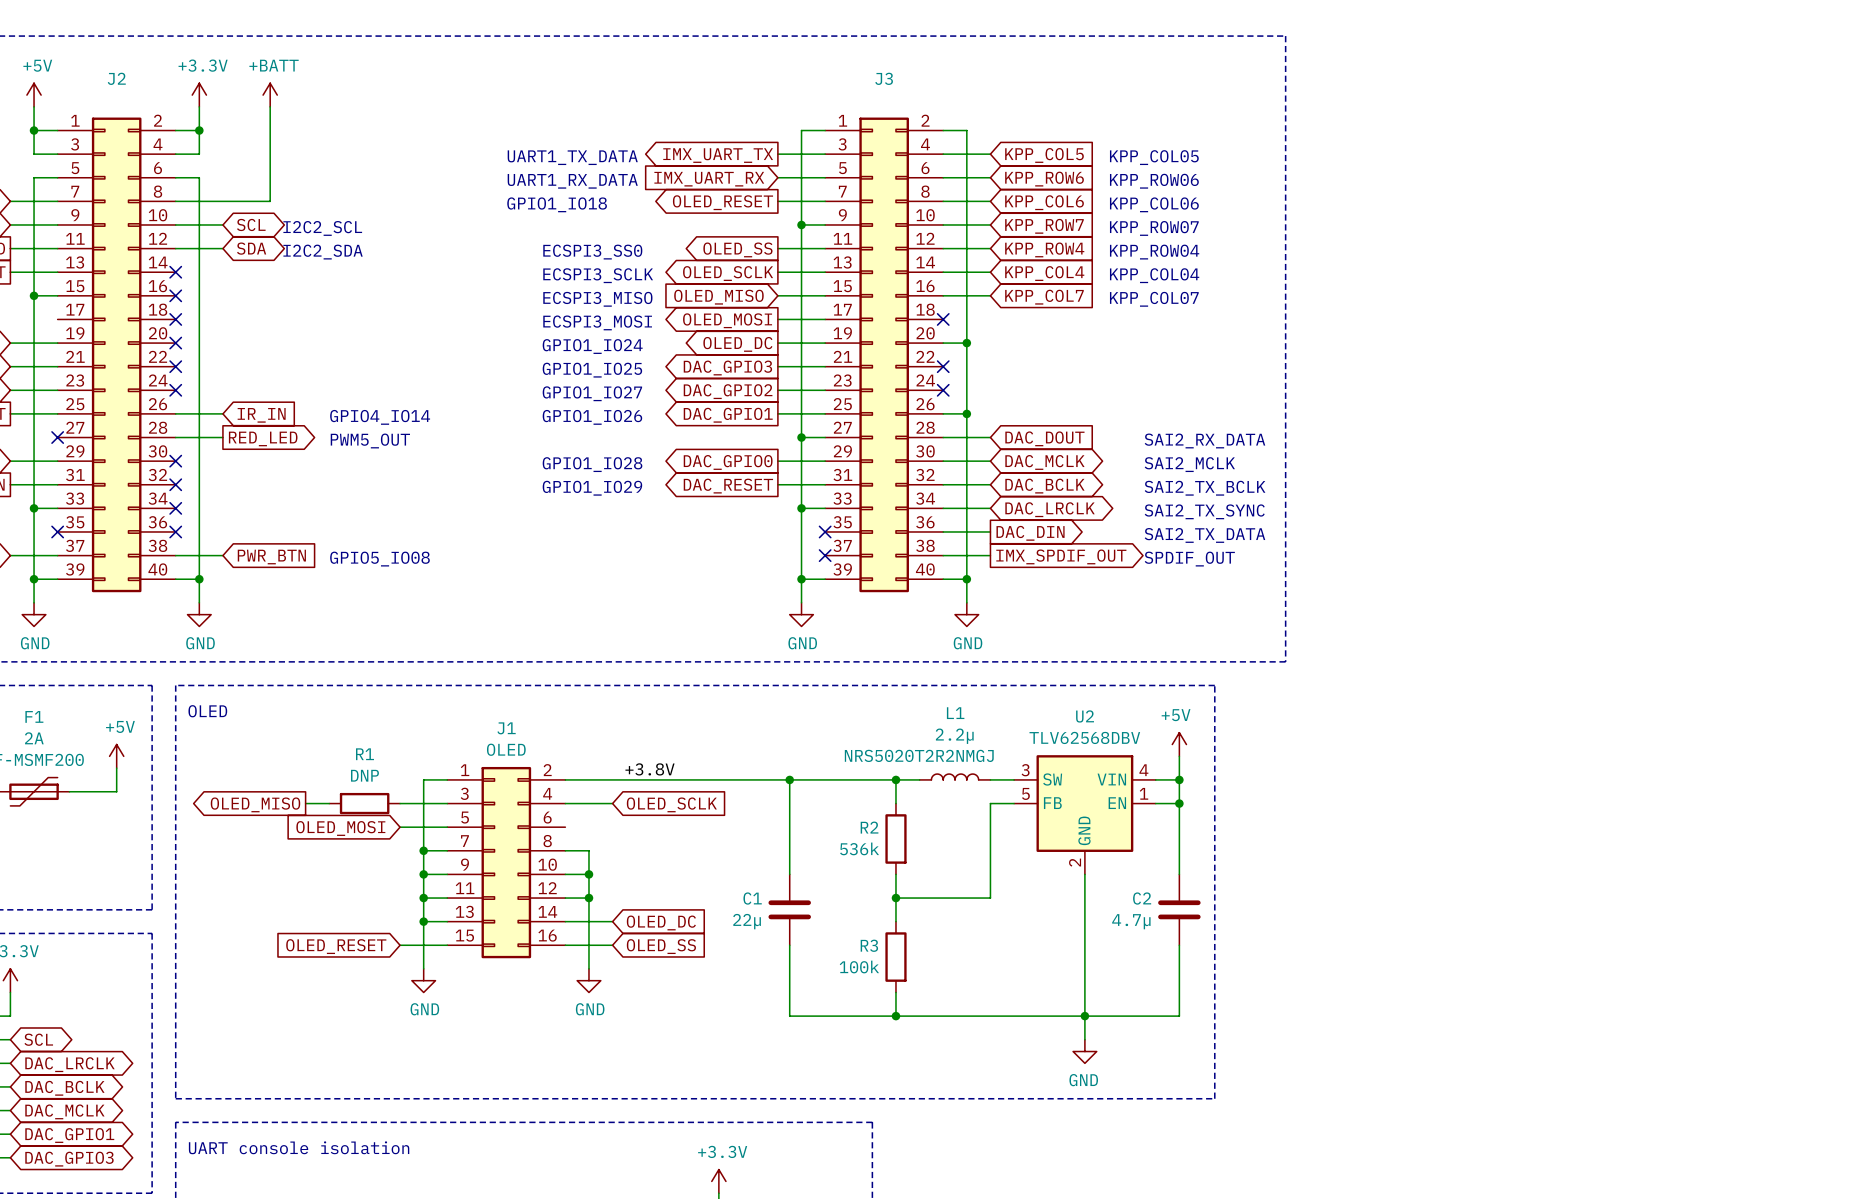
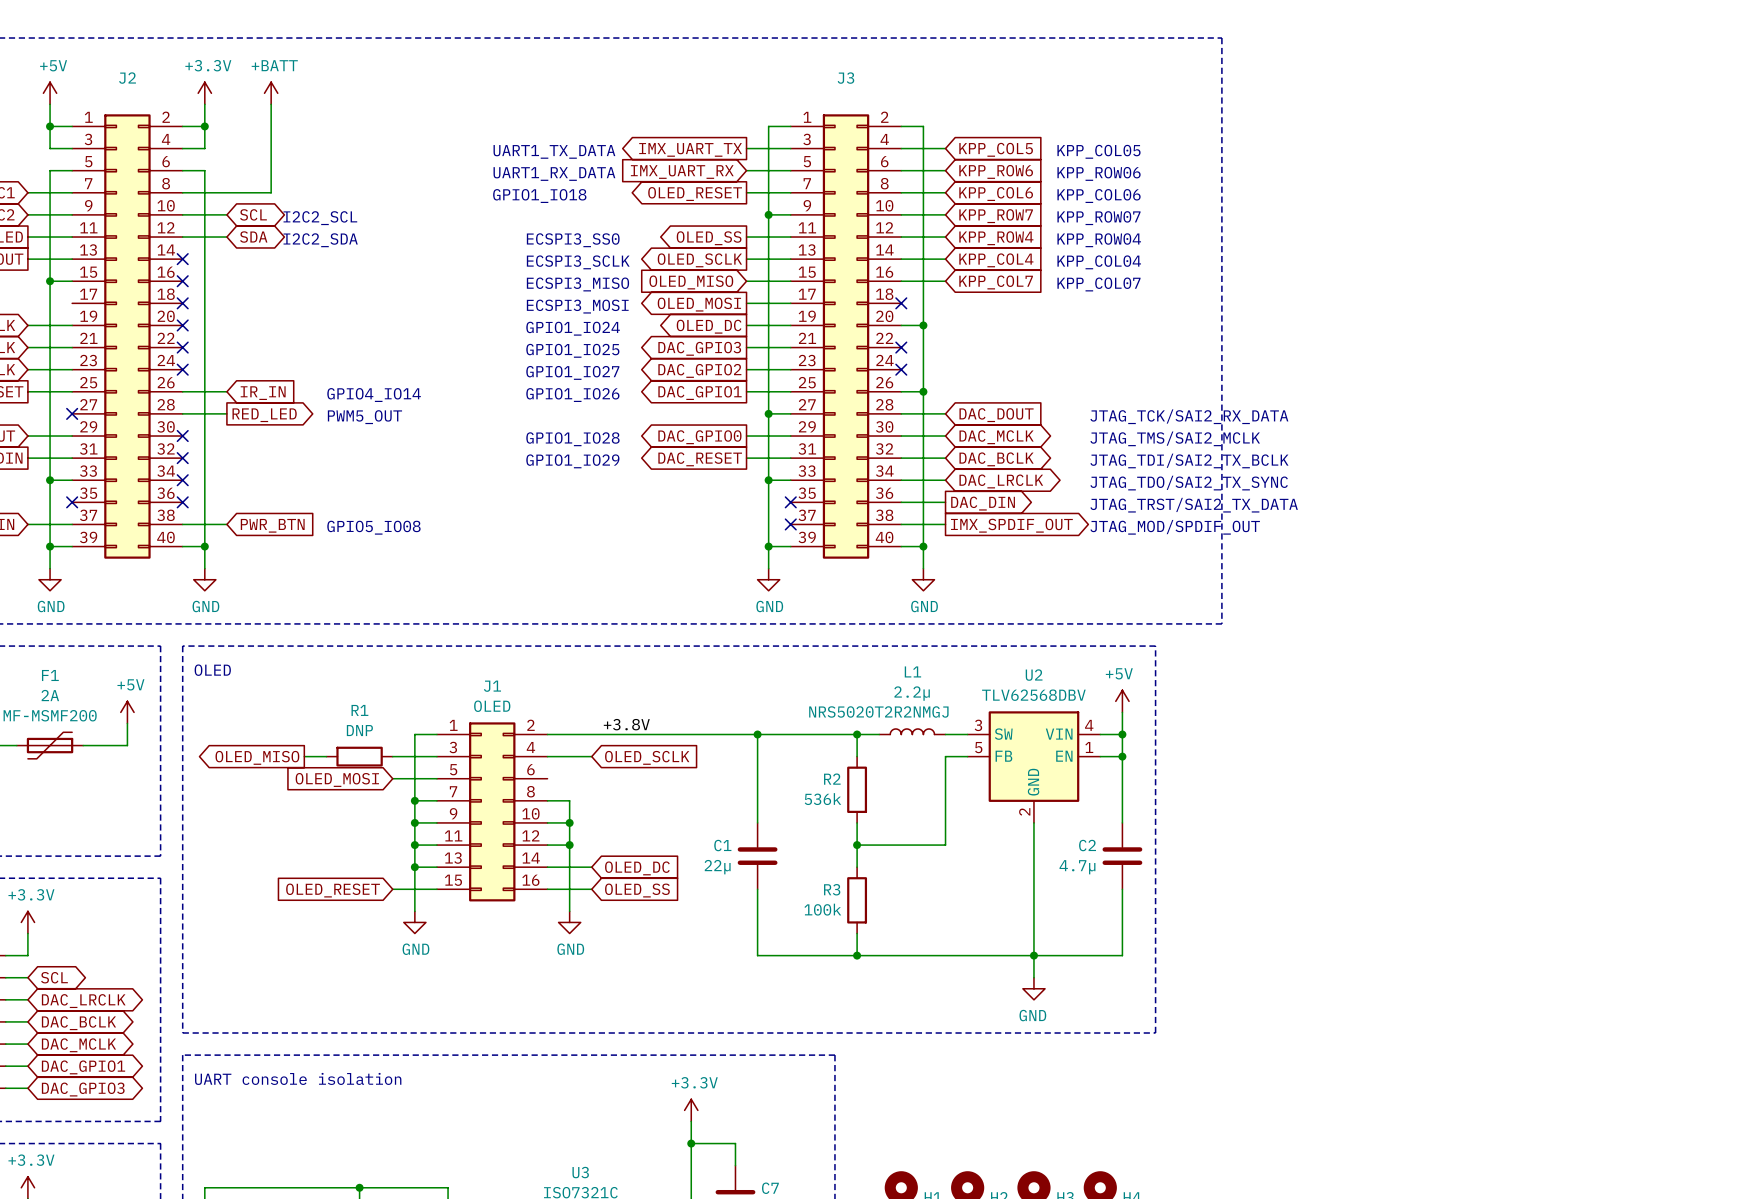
text: SAI2_RX_DATA (1204, 440) -> JTAG_TCK/SAI2_RX_DATA (1189, 416)
text: SAI2_MCLK (1189, 464) -> JTAG_TMS/SAI2_MCLK (1175, 438)
text: SAI2_TX_BCLK (1205, 488) -> JTAG_TDI/SAI2_TX_BCLK (1189, 460)
text: SAI2_TX_SYNC (1204, 511) -> JTAG_TDO/SAI2_TX_SYNC (1189, 483)
text: SAI2_TX_DATA (1204, 535) -> JTAG_TRST/SAI2_TX_DATA (1194, 505)
text: SPDIF_OUT (1189, 559) -> JTAG_MOD/SPDIF_OUT (1175, 527)

